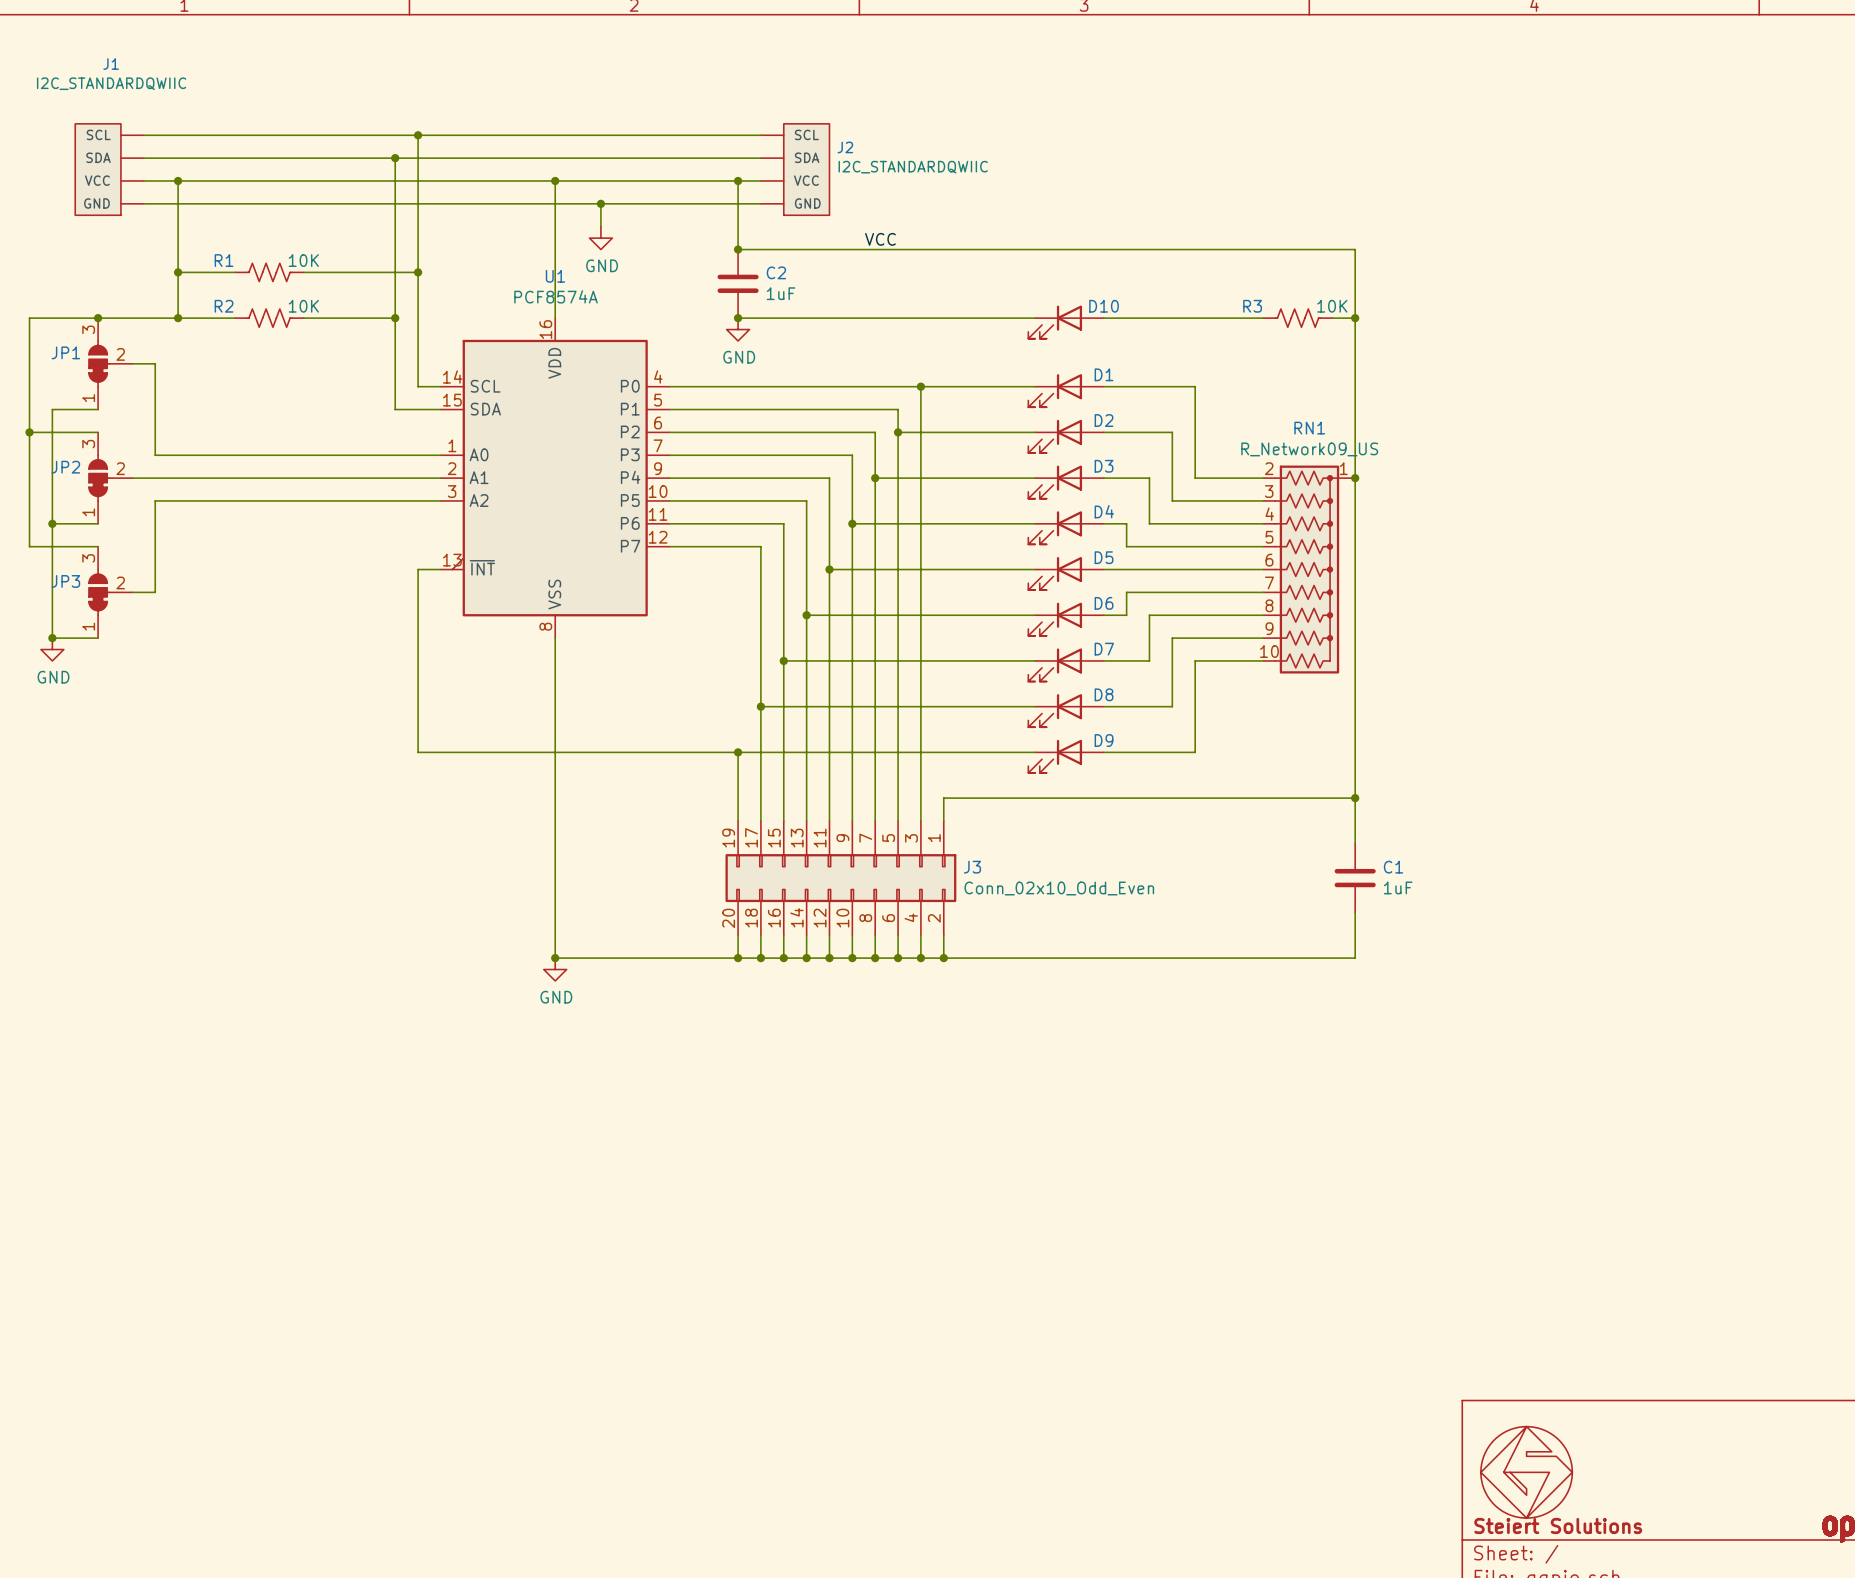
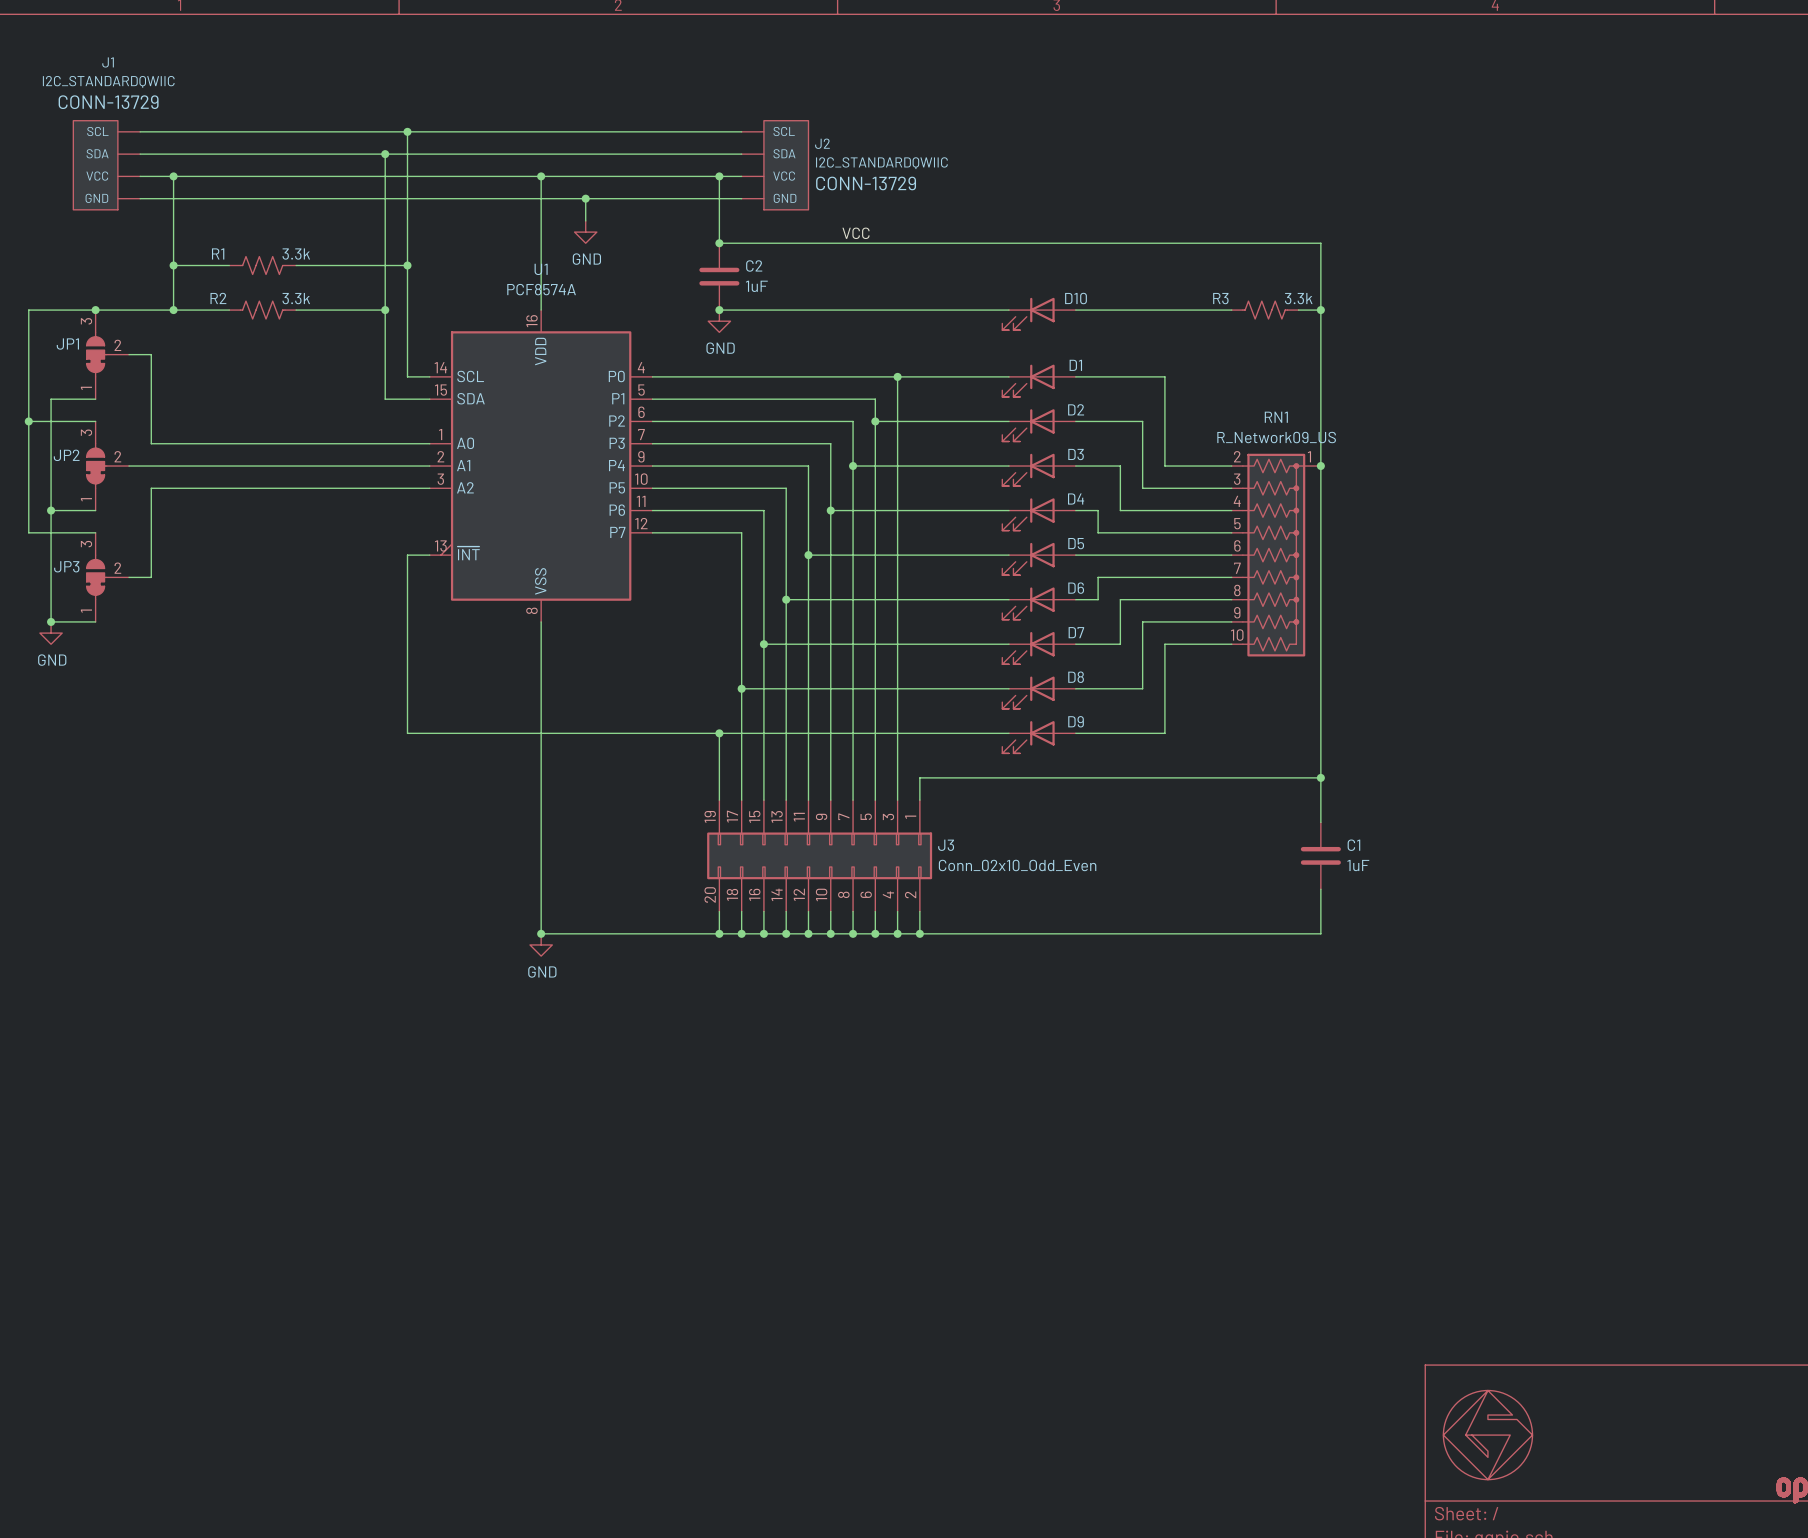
J1 text: none -> CONN-13729 (108, 102)
J2 text: none -> CONN-13729 (866, 183)
R1 value: 10K (303, 260) -> 3.3k (296, 254)
R2 value: 10K (303, 306) -> 3.3k (296, 298)
R3 value: 10K (1332, 306) -> 3.3k (1298, 298)
title block: Steiert Solutions (1558, 1525) -> none

